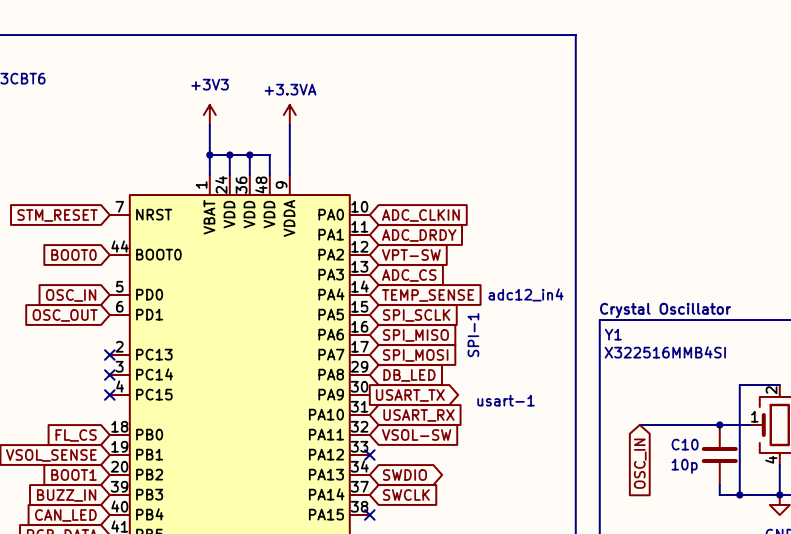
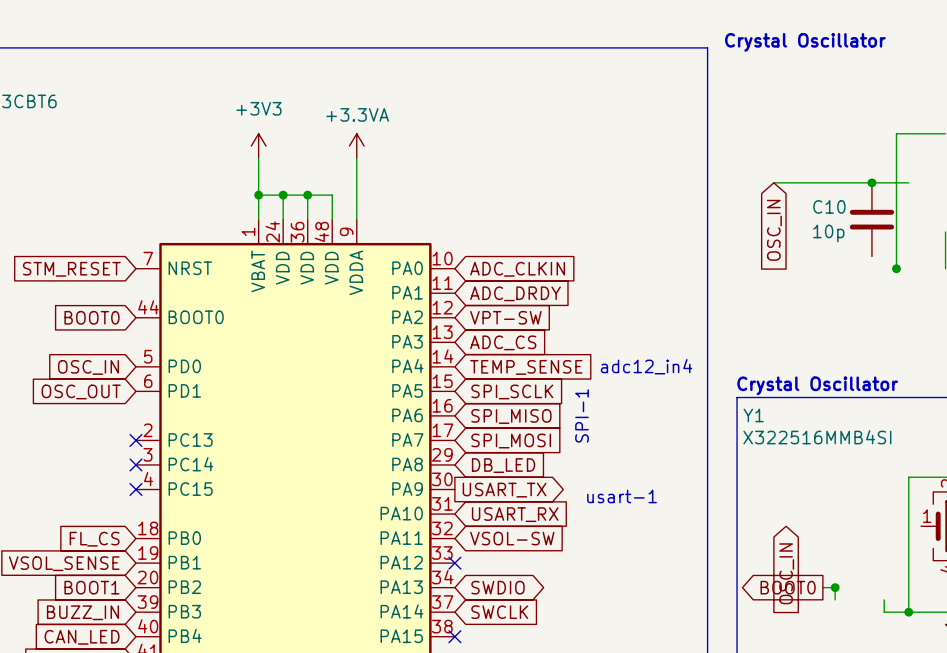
text: none -> Crystal Oscillator (805, 42)
wire: none -> (945, 133) (896, 133) (896, 268)
wire: none -> (773, 182) (908, 182)
junction: none -> (871, 182)
global label: none -> OSC_IN (774, 230)
wire: none -> (945, 231) (945, 268)
junction: none -> (896, 268)
wire: (639, 425) (749, 425) -> none
junction: (719, 425) -> none
C10 position: (719, 455) -> (871, 219)
global label: none -> BOOT0 (788, 587)
wire: none -> (822, 587) (835, 587) (835, 599)
junction: none -> (835, 587)

